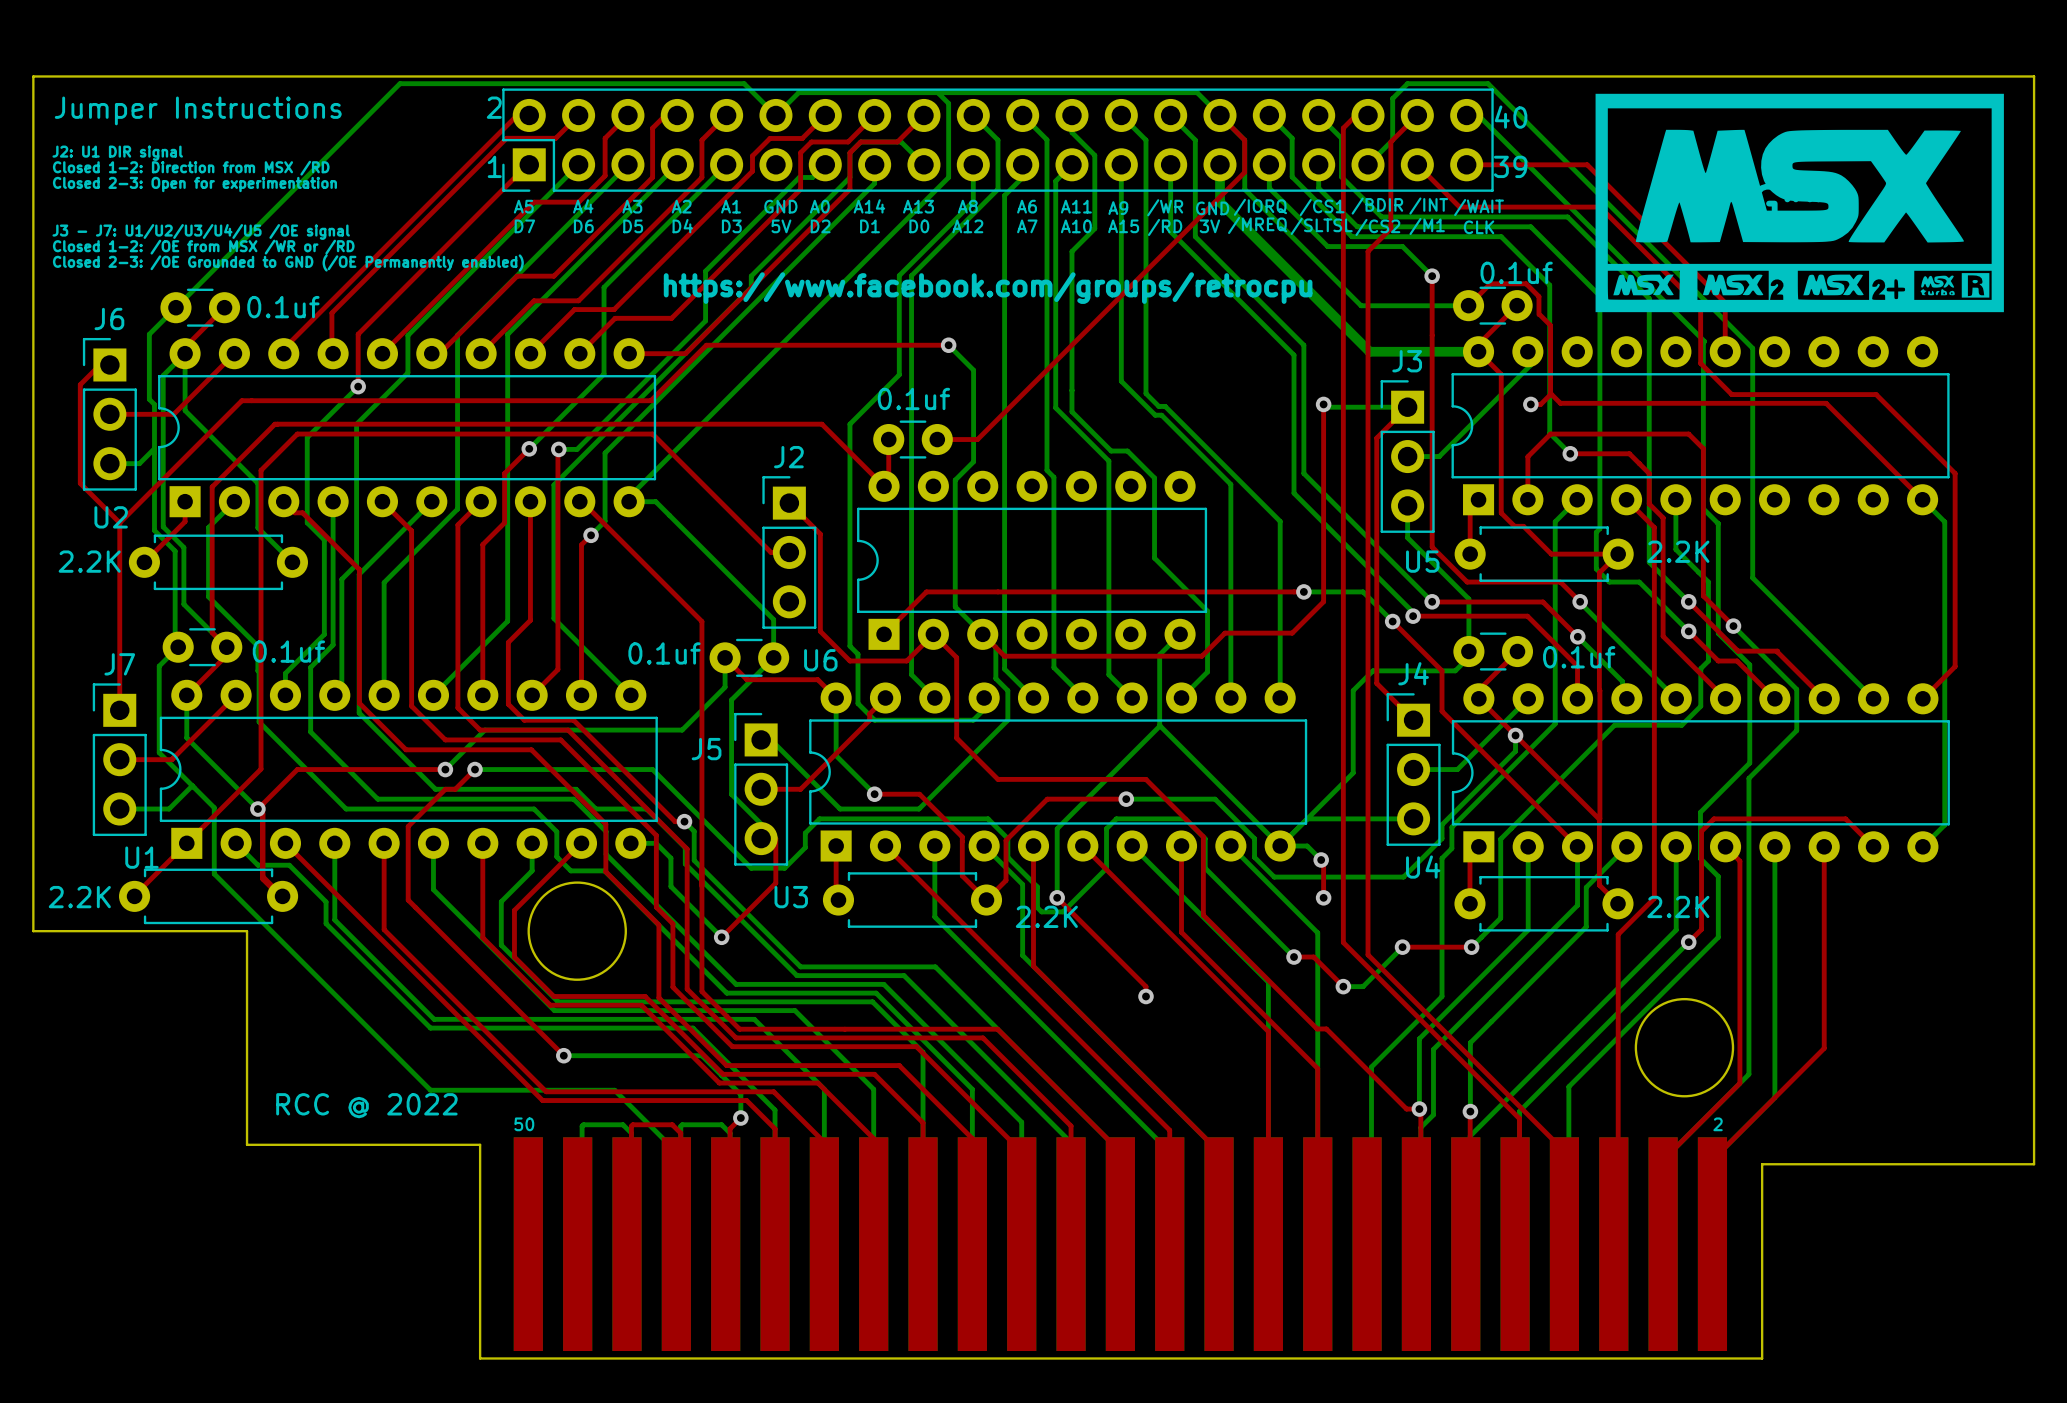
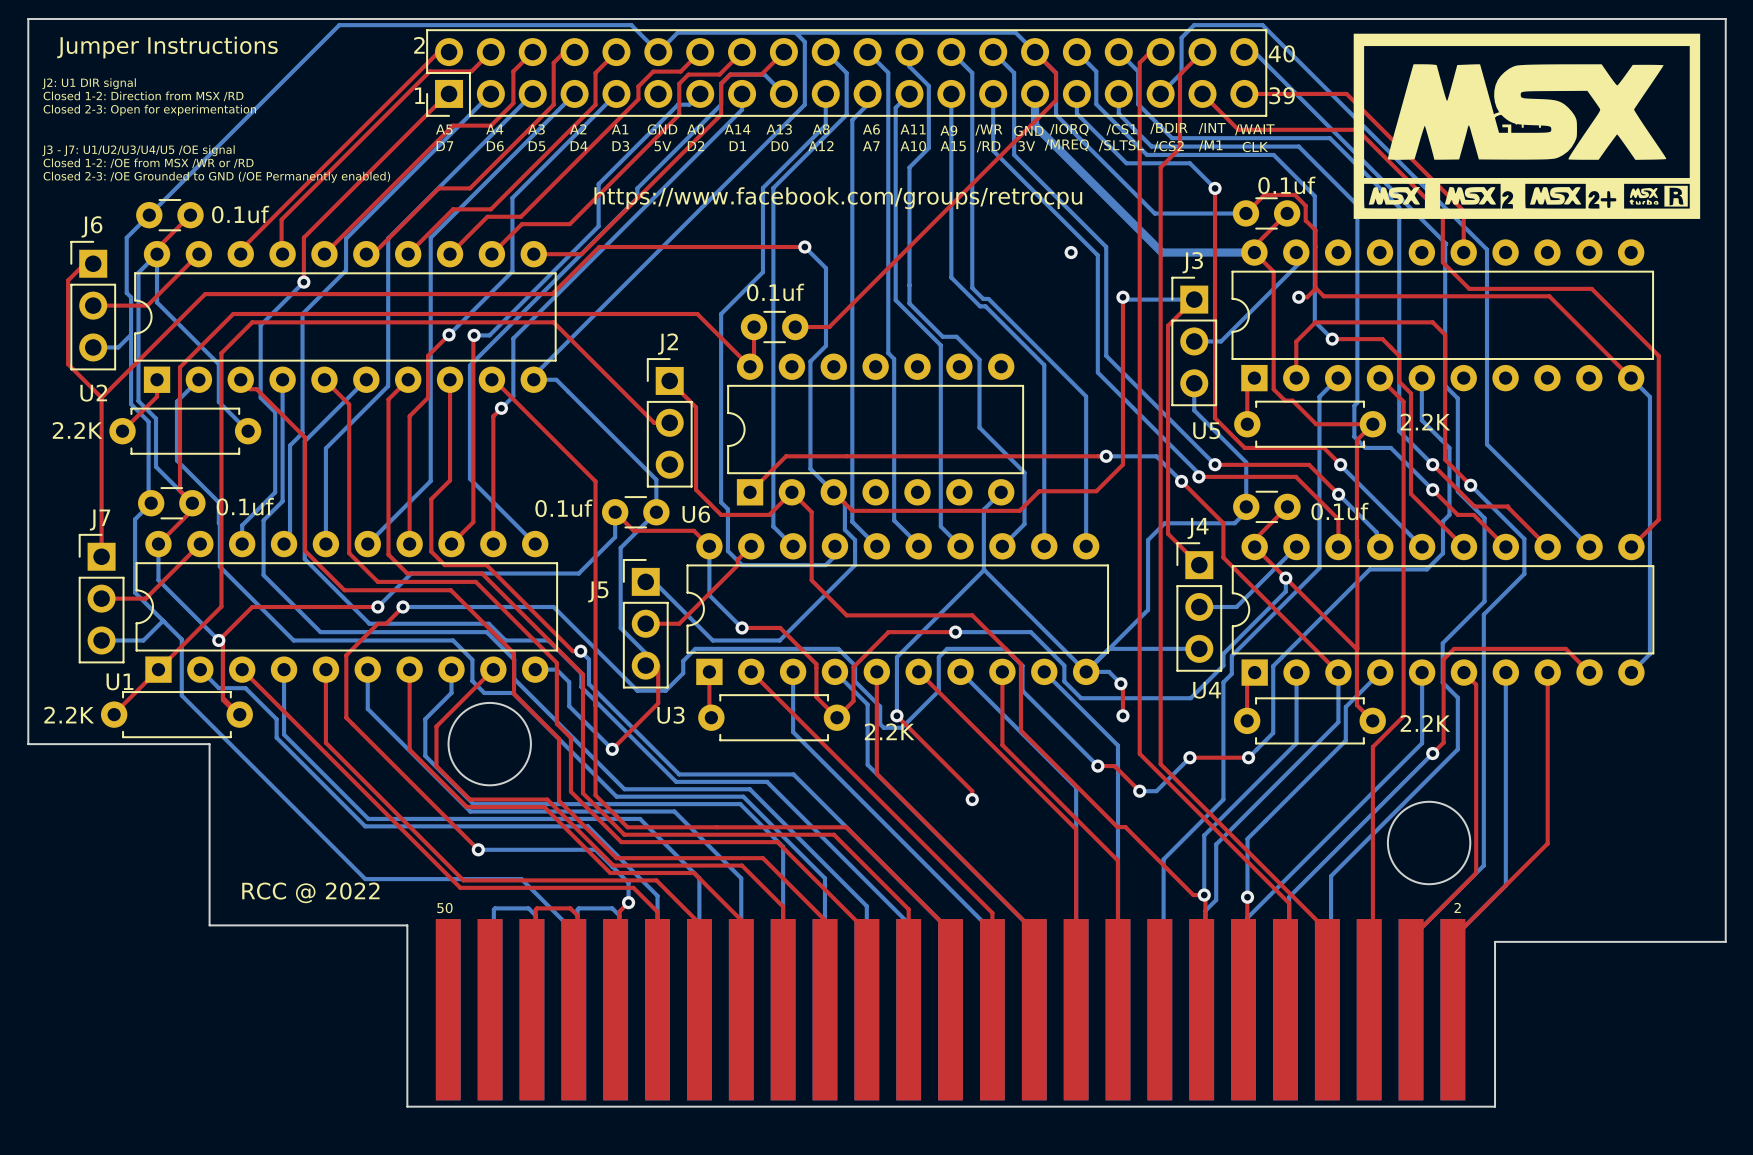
via: none -> (1071, 252)

